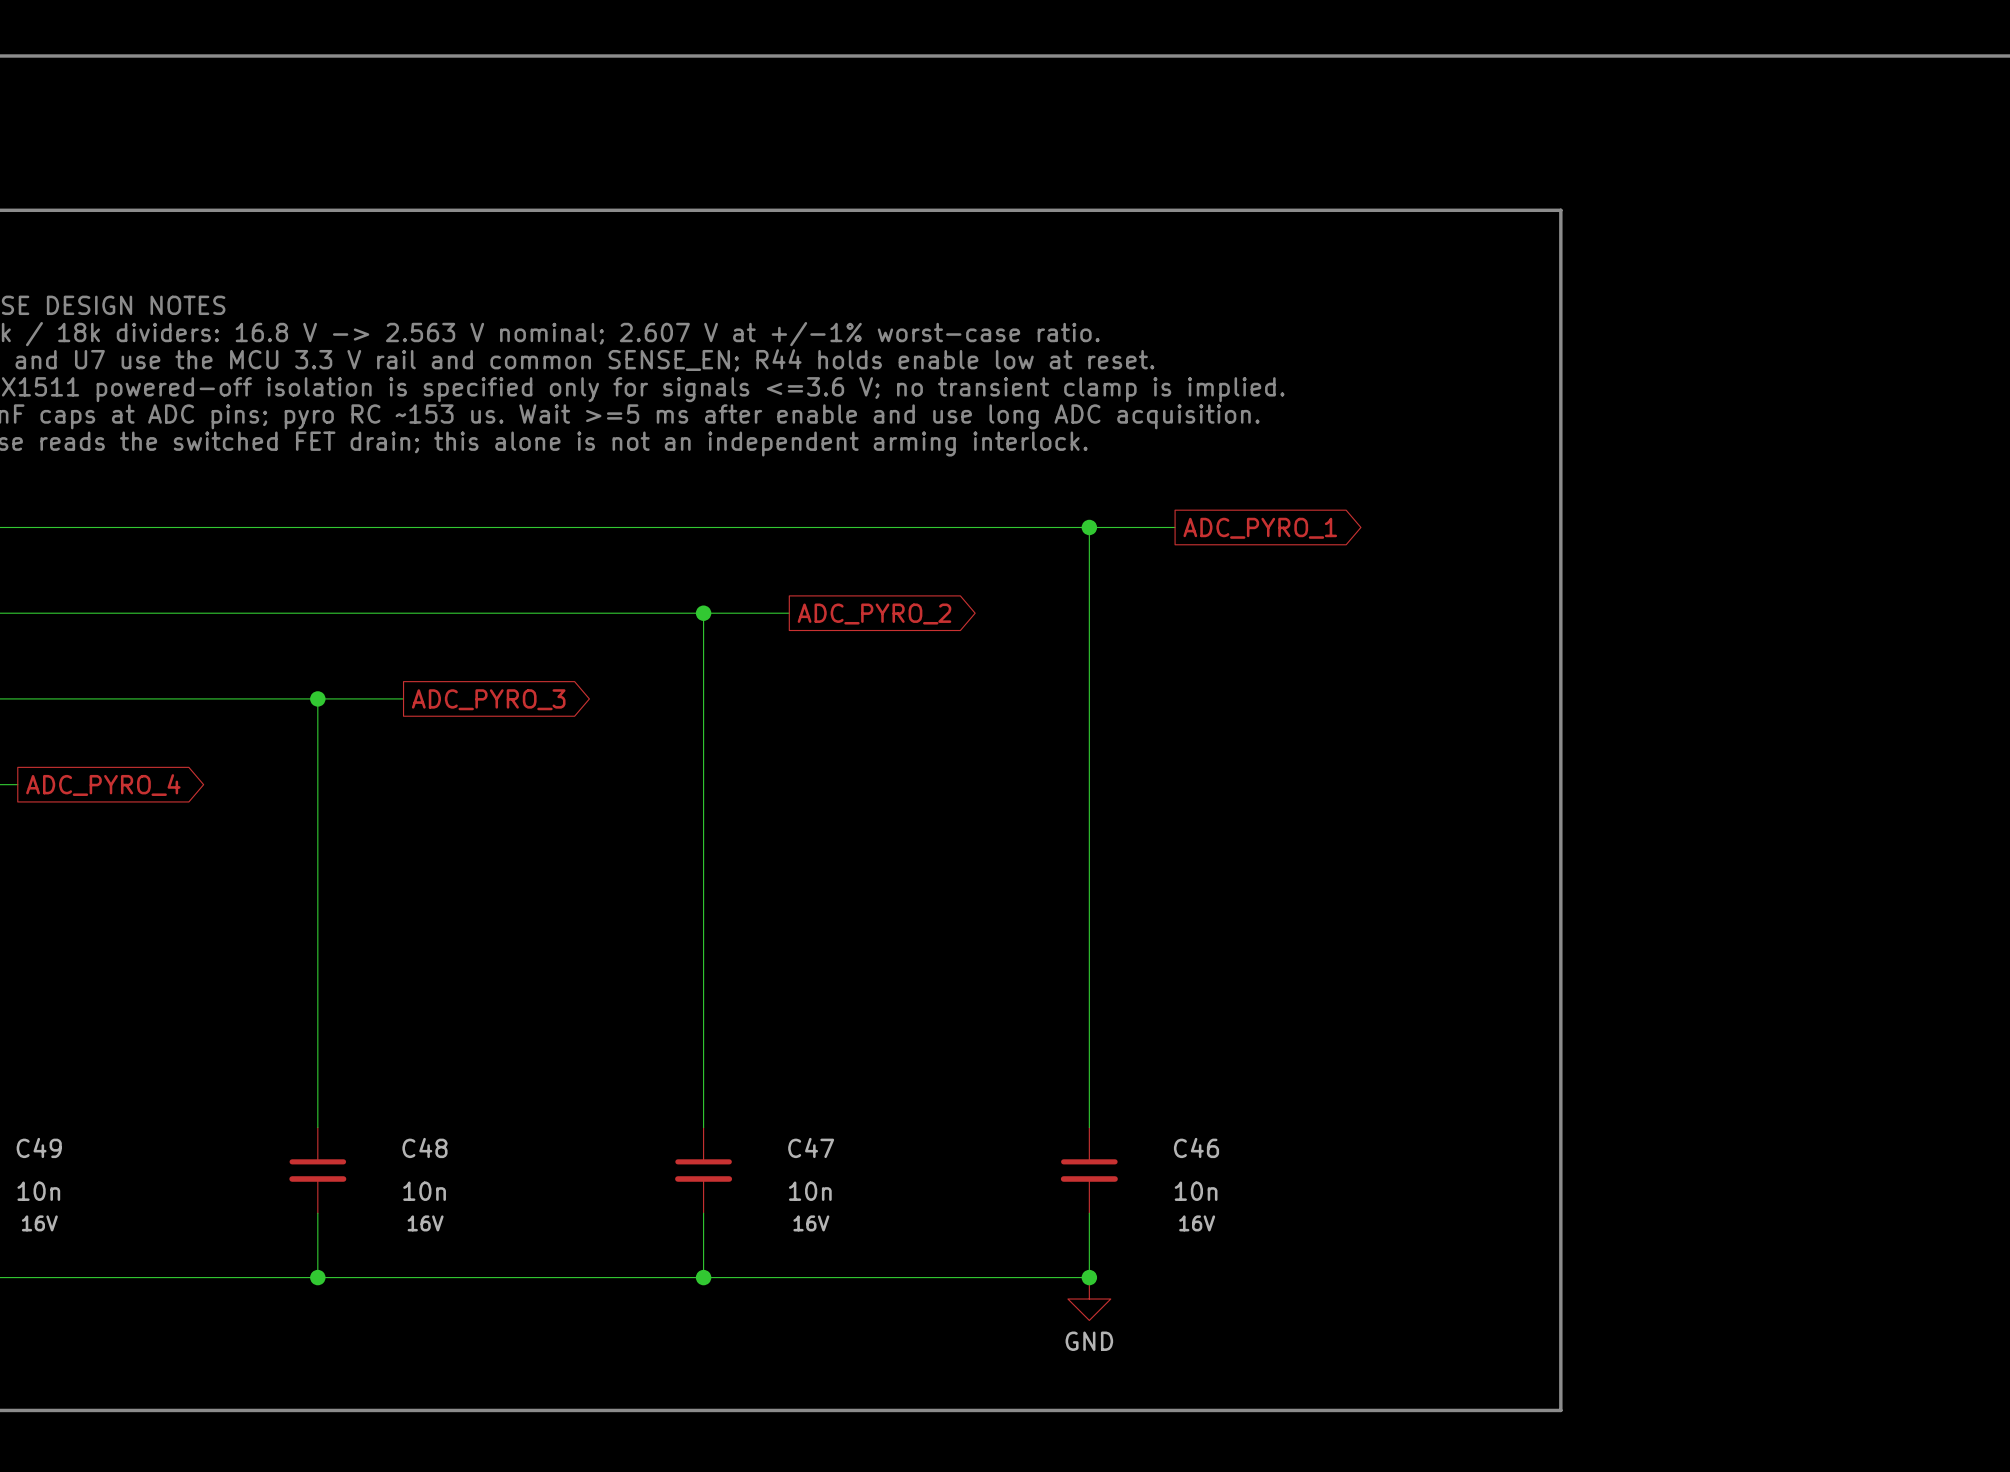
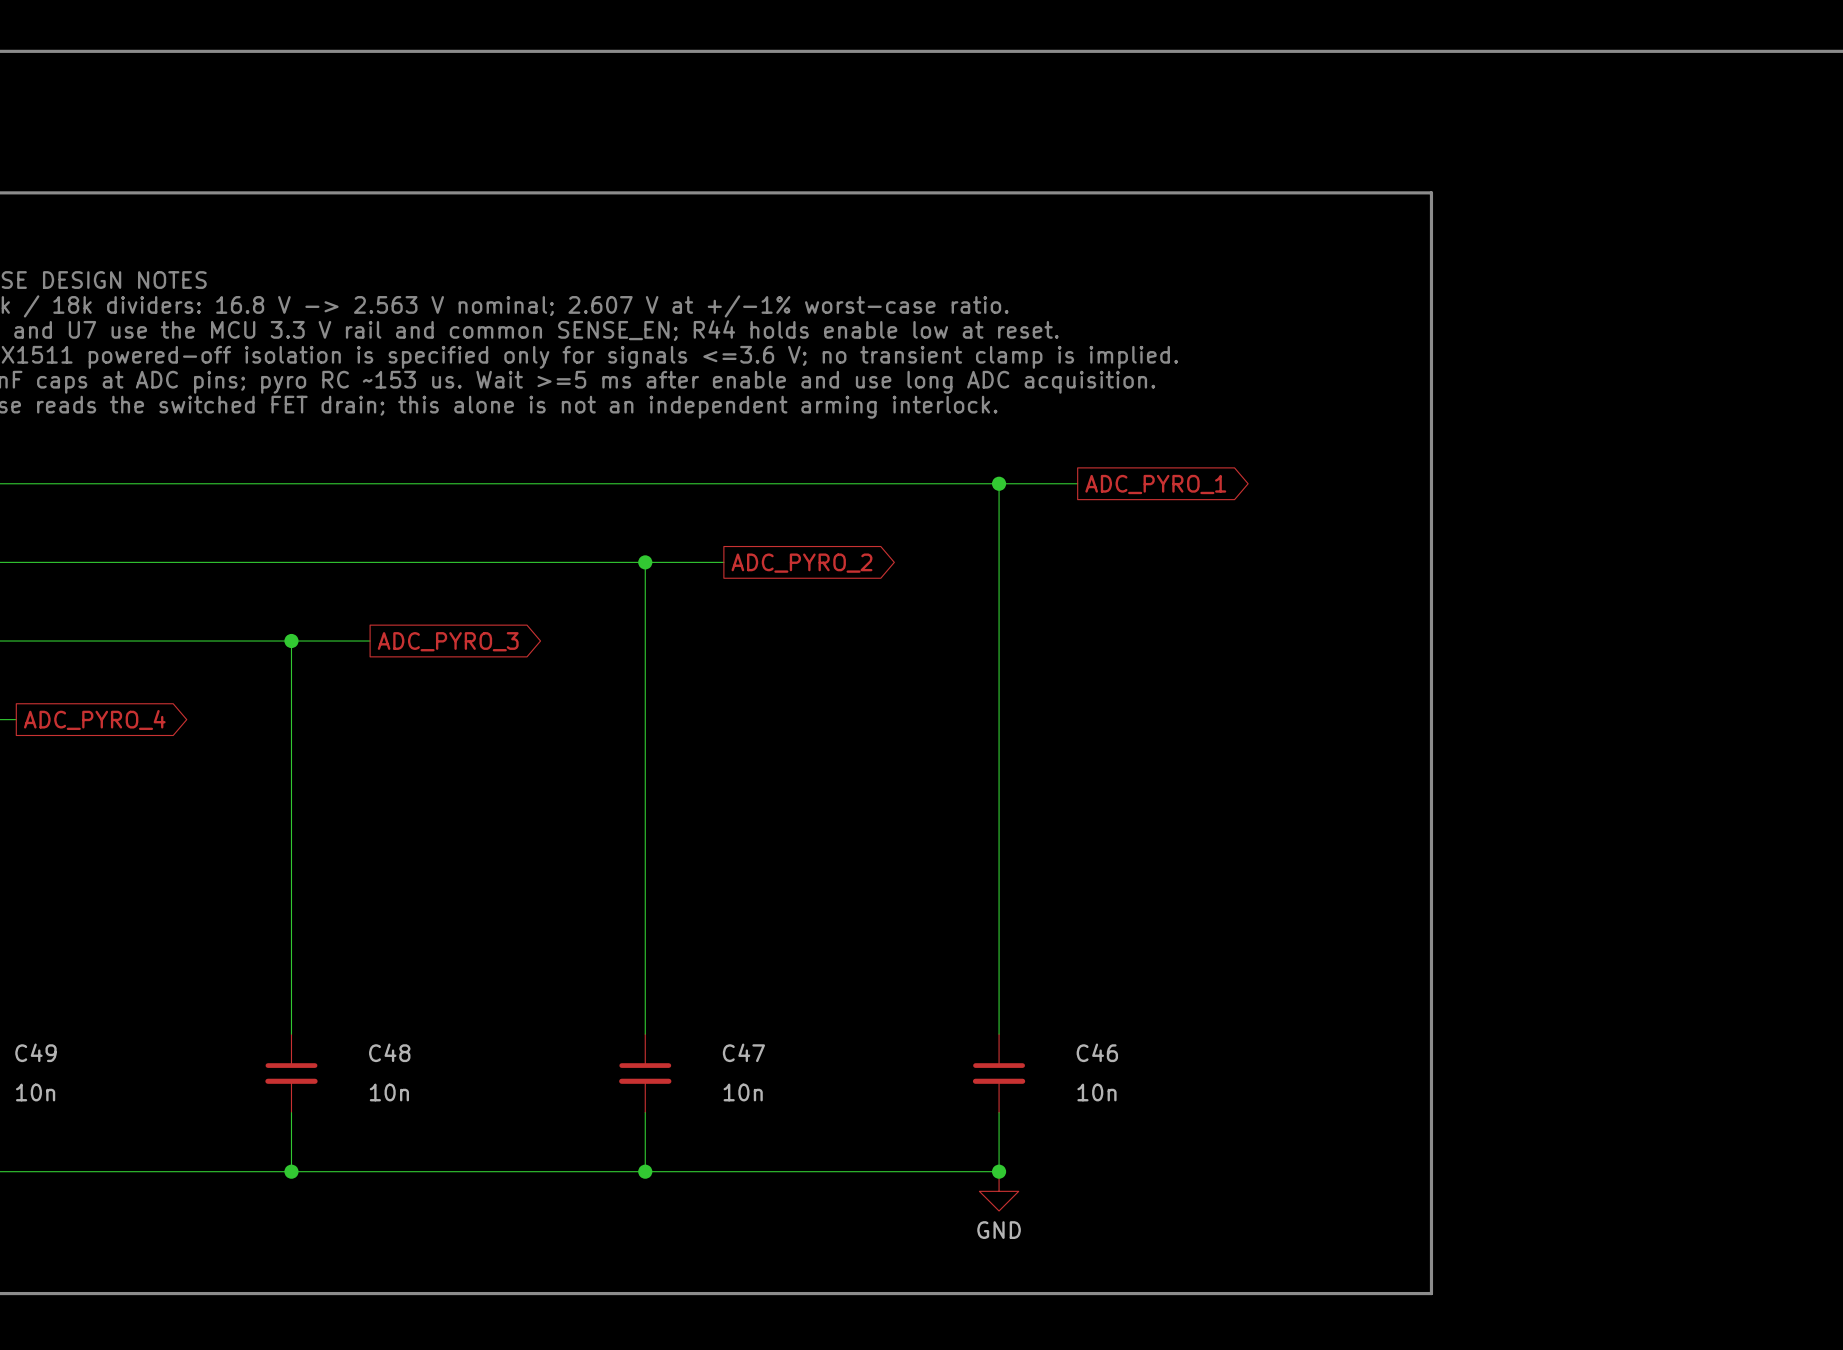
C49 text: 16V (39, 1223) -> none
C48 text: 16V (425, 1223) -> none
C47 text: 16V (811, 1223) -> none
C46 text: 16V (1197, 1223) -> none

